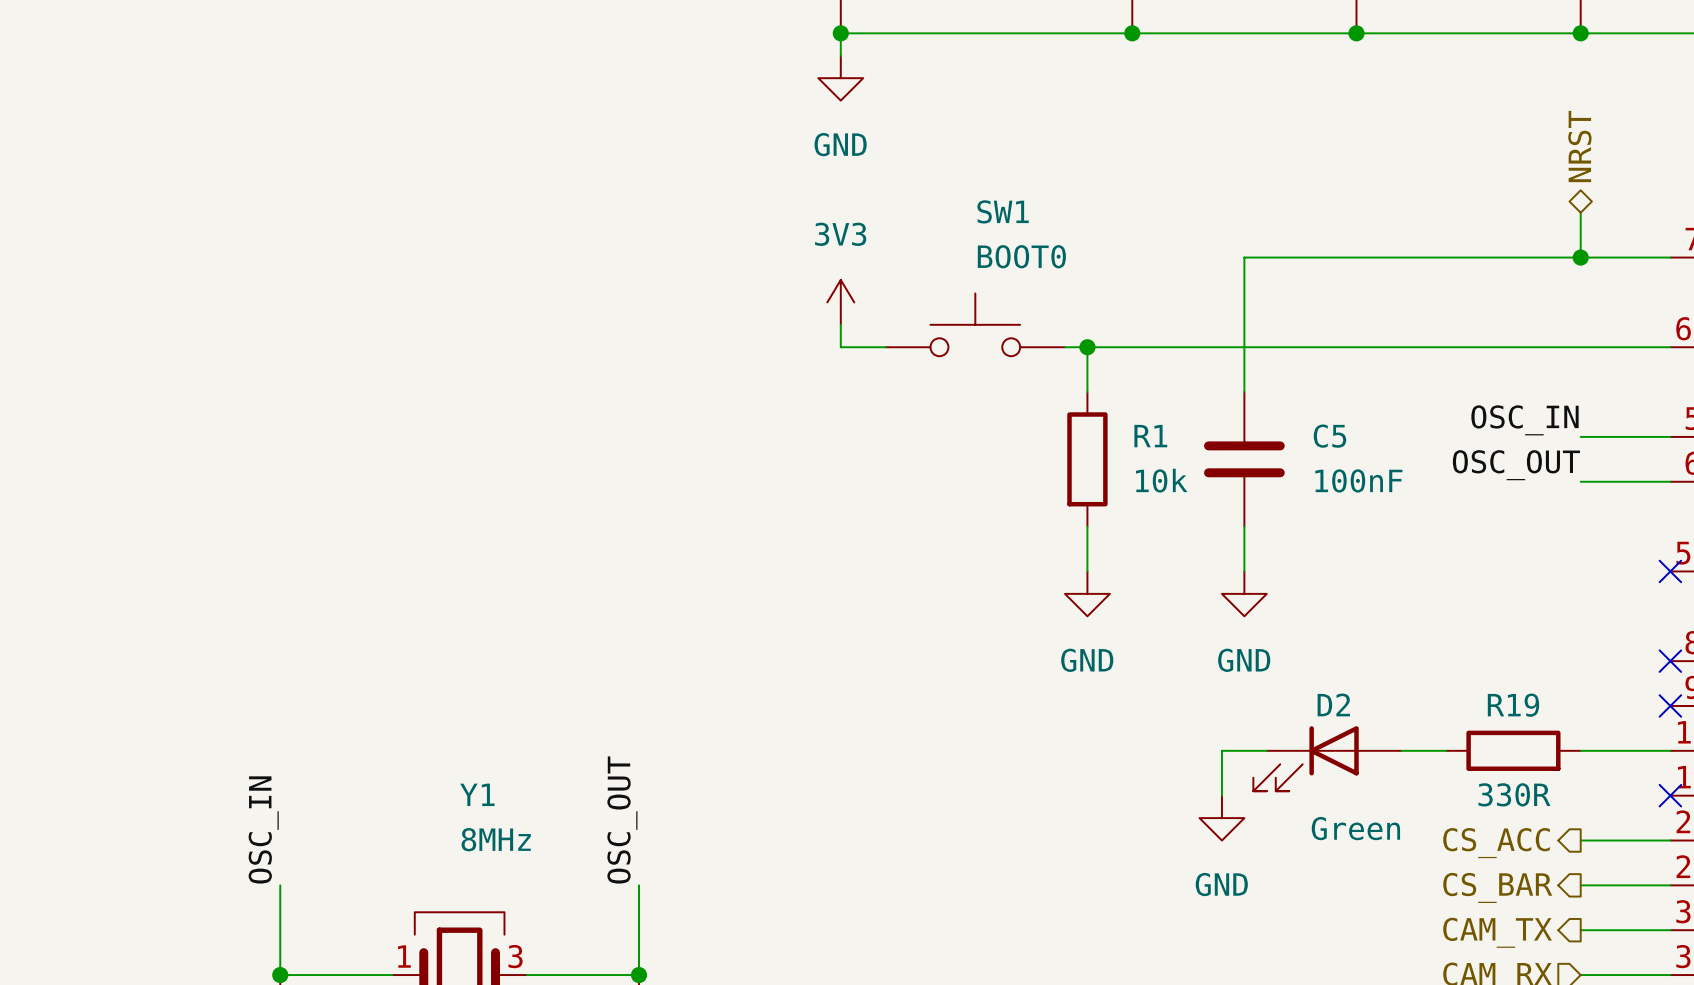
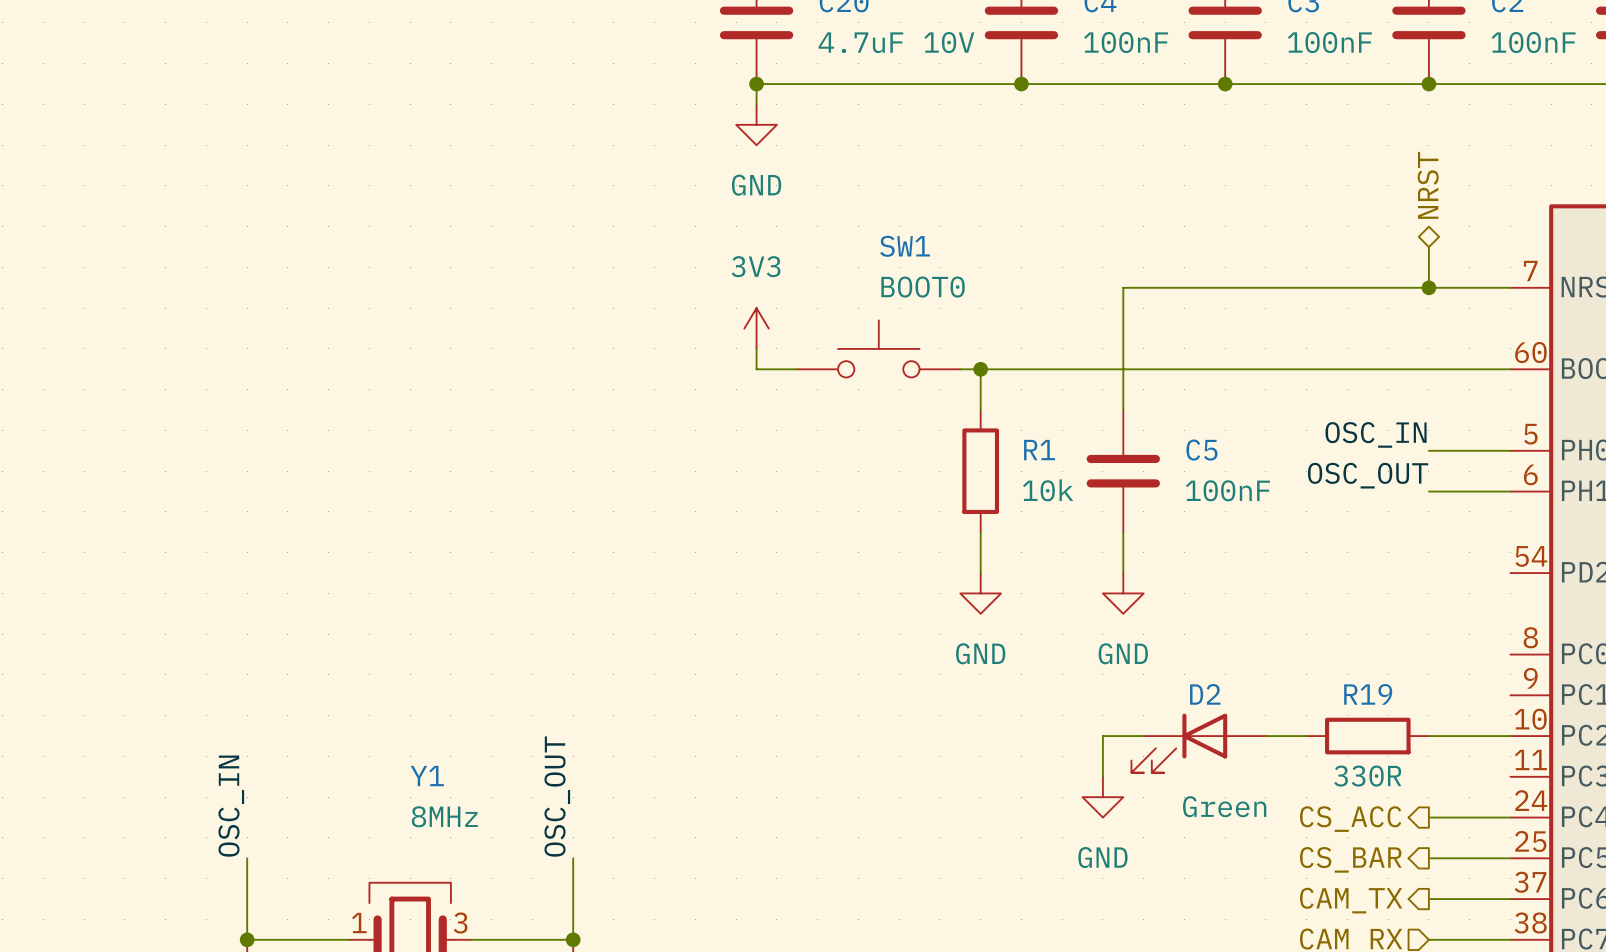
no-connect mark: (1670, 571) -> none
no-connect mark: (1670, 661) -> none
no-connect mark: (1670, 705) -> none
no-connect mark: (1670, 795) -> none

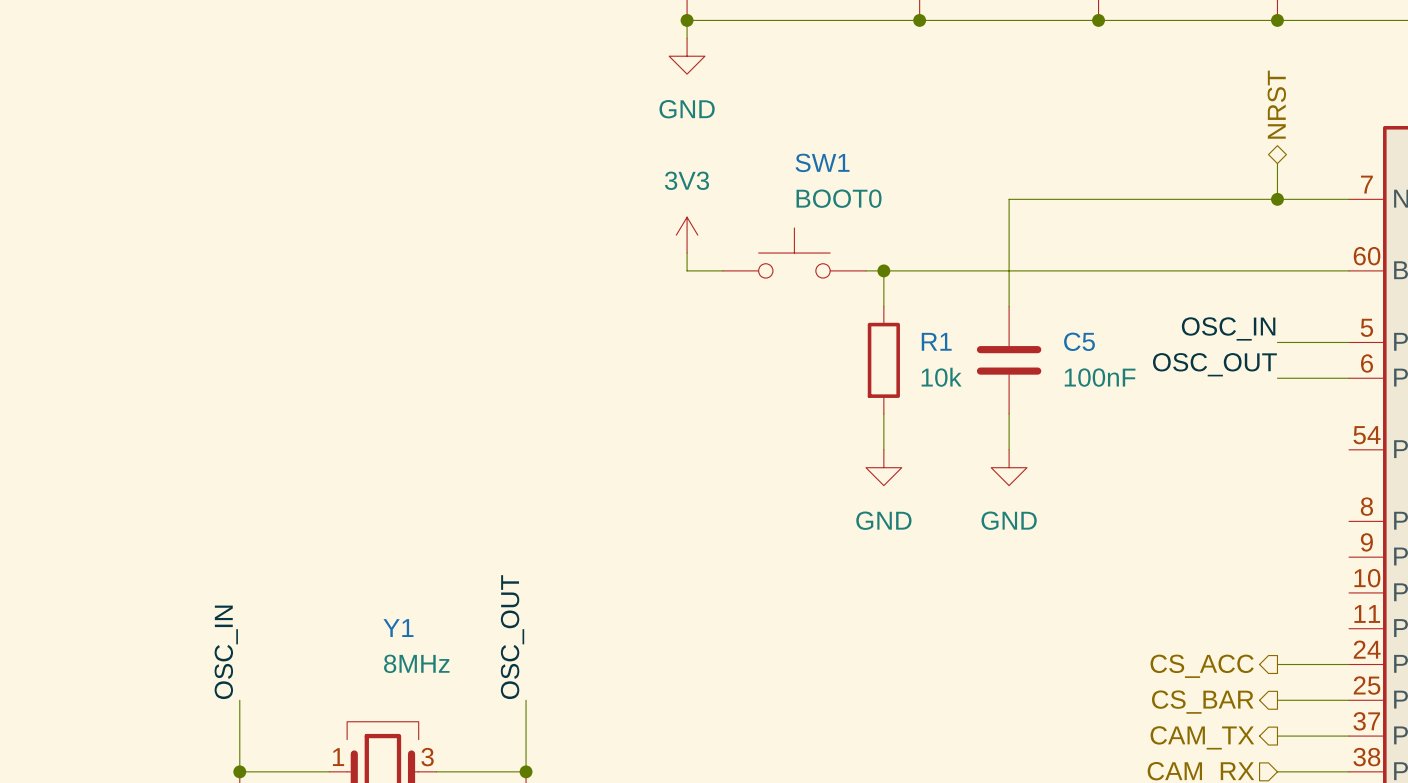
wire: (1143, 736) (1102, 736) (1102, 776) -> none
wire: (1265, 736) (1306, 736) -> none
R19: 330R (1367, 736) -> none
wire: (1428, 736) (1510, 736) -> none
D2: Green (1198, 743) -> none
power symbol: GND (1102, 797) -> none

